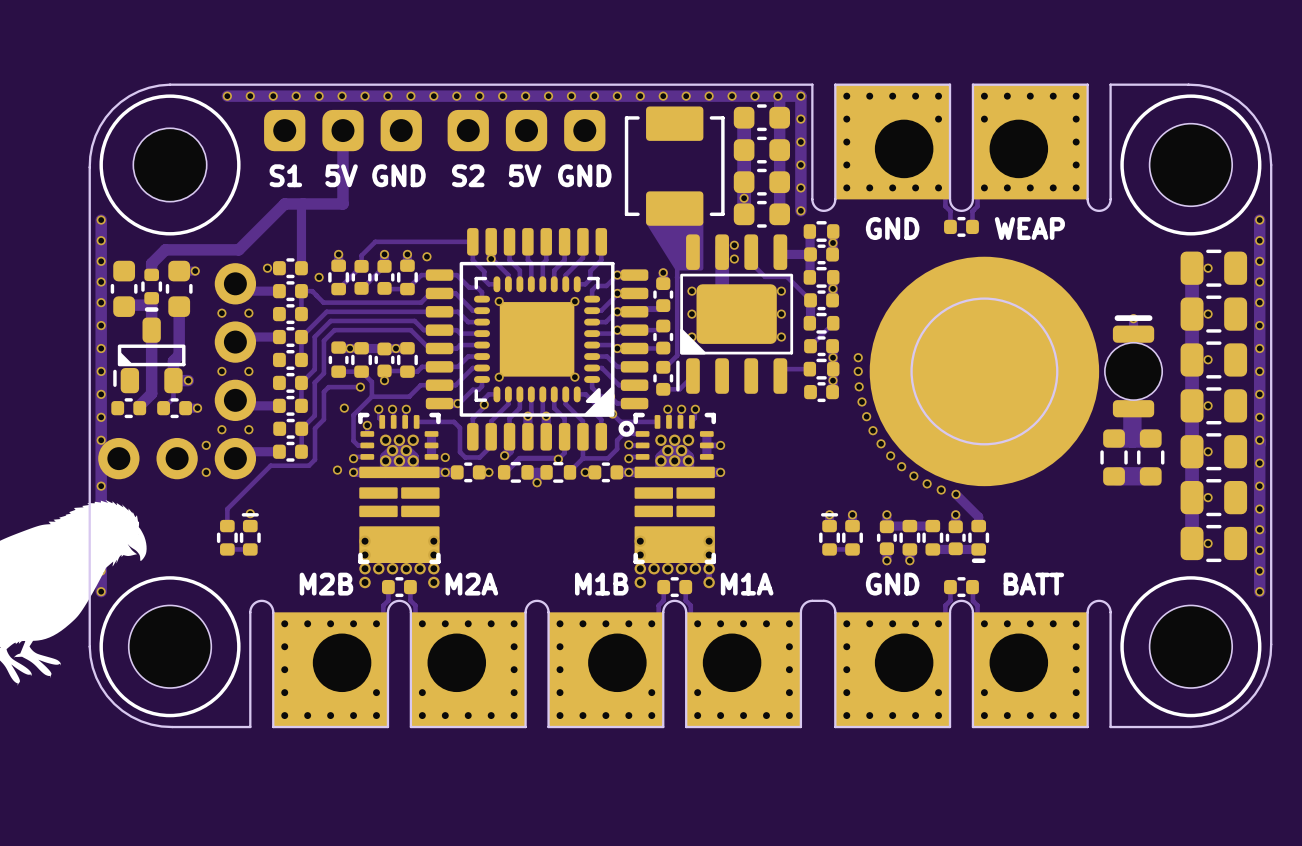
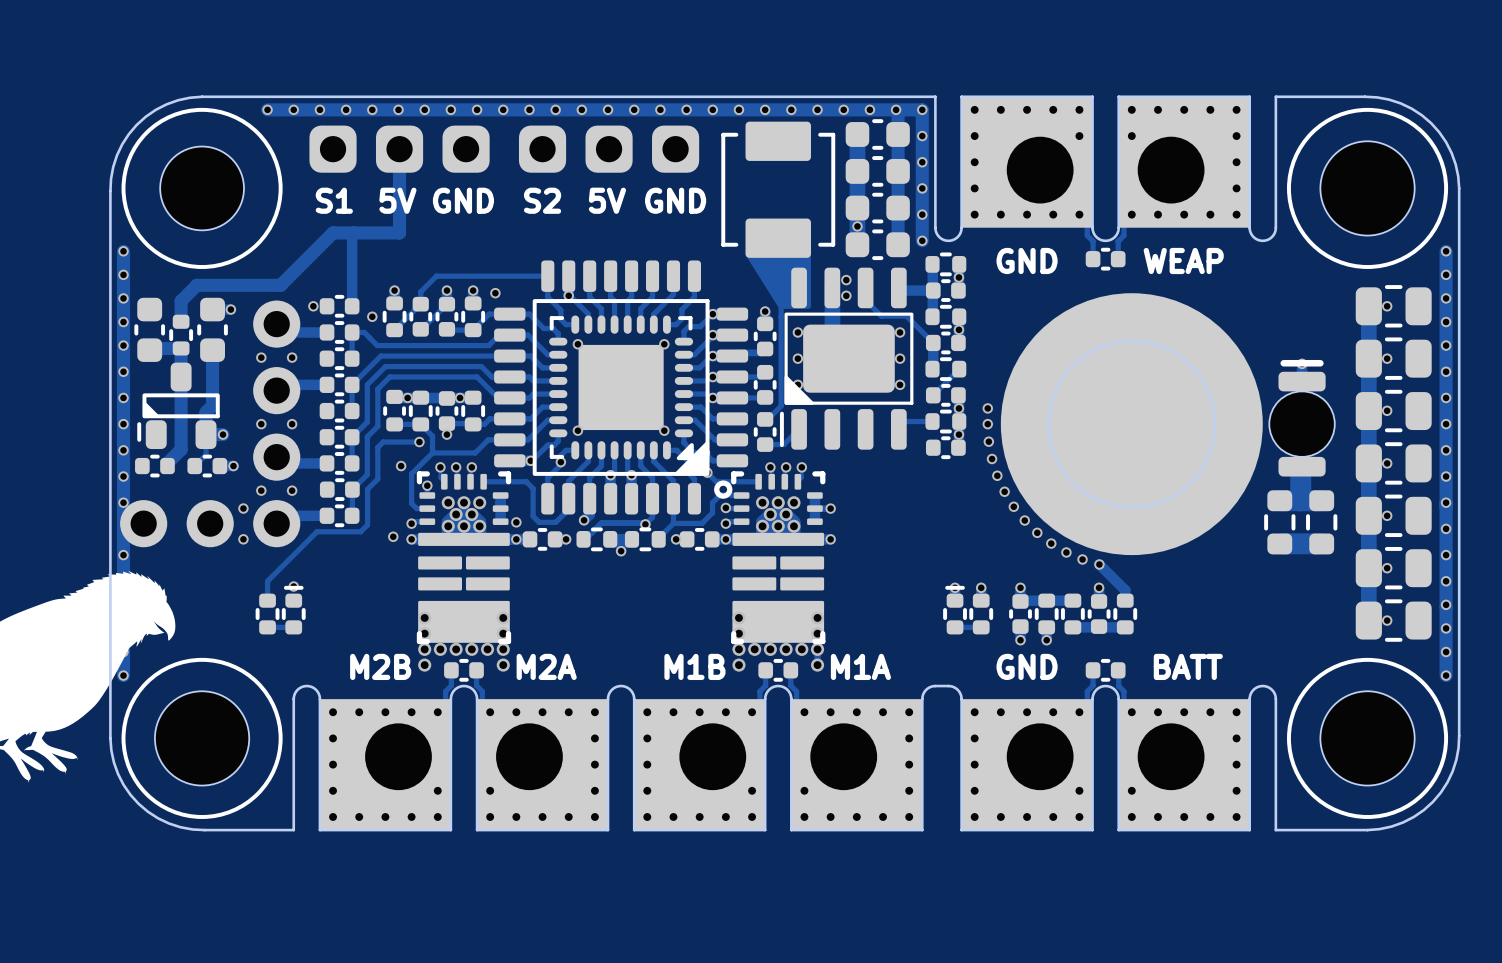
part footprint: [141, 268, 163, 312] -> [169, 314, 194, 356]
part footprint: [968, 519, 990, 564] -> [1113, 593, 1138, 635]

